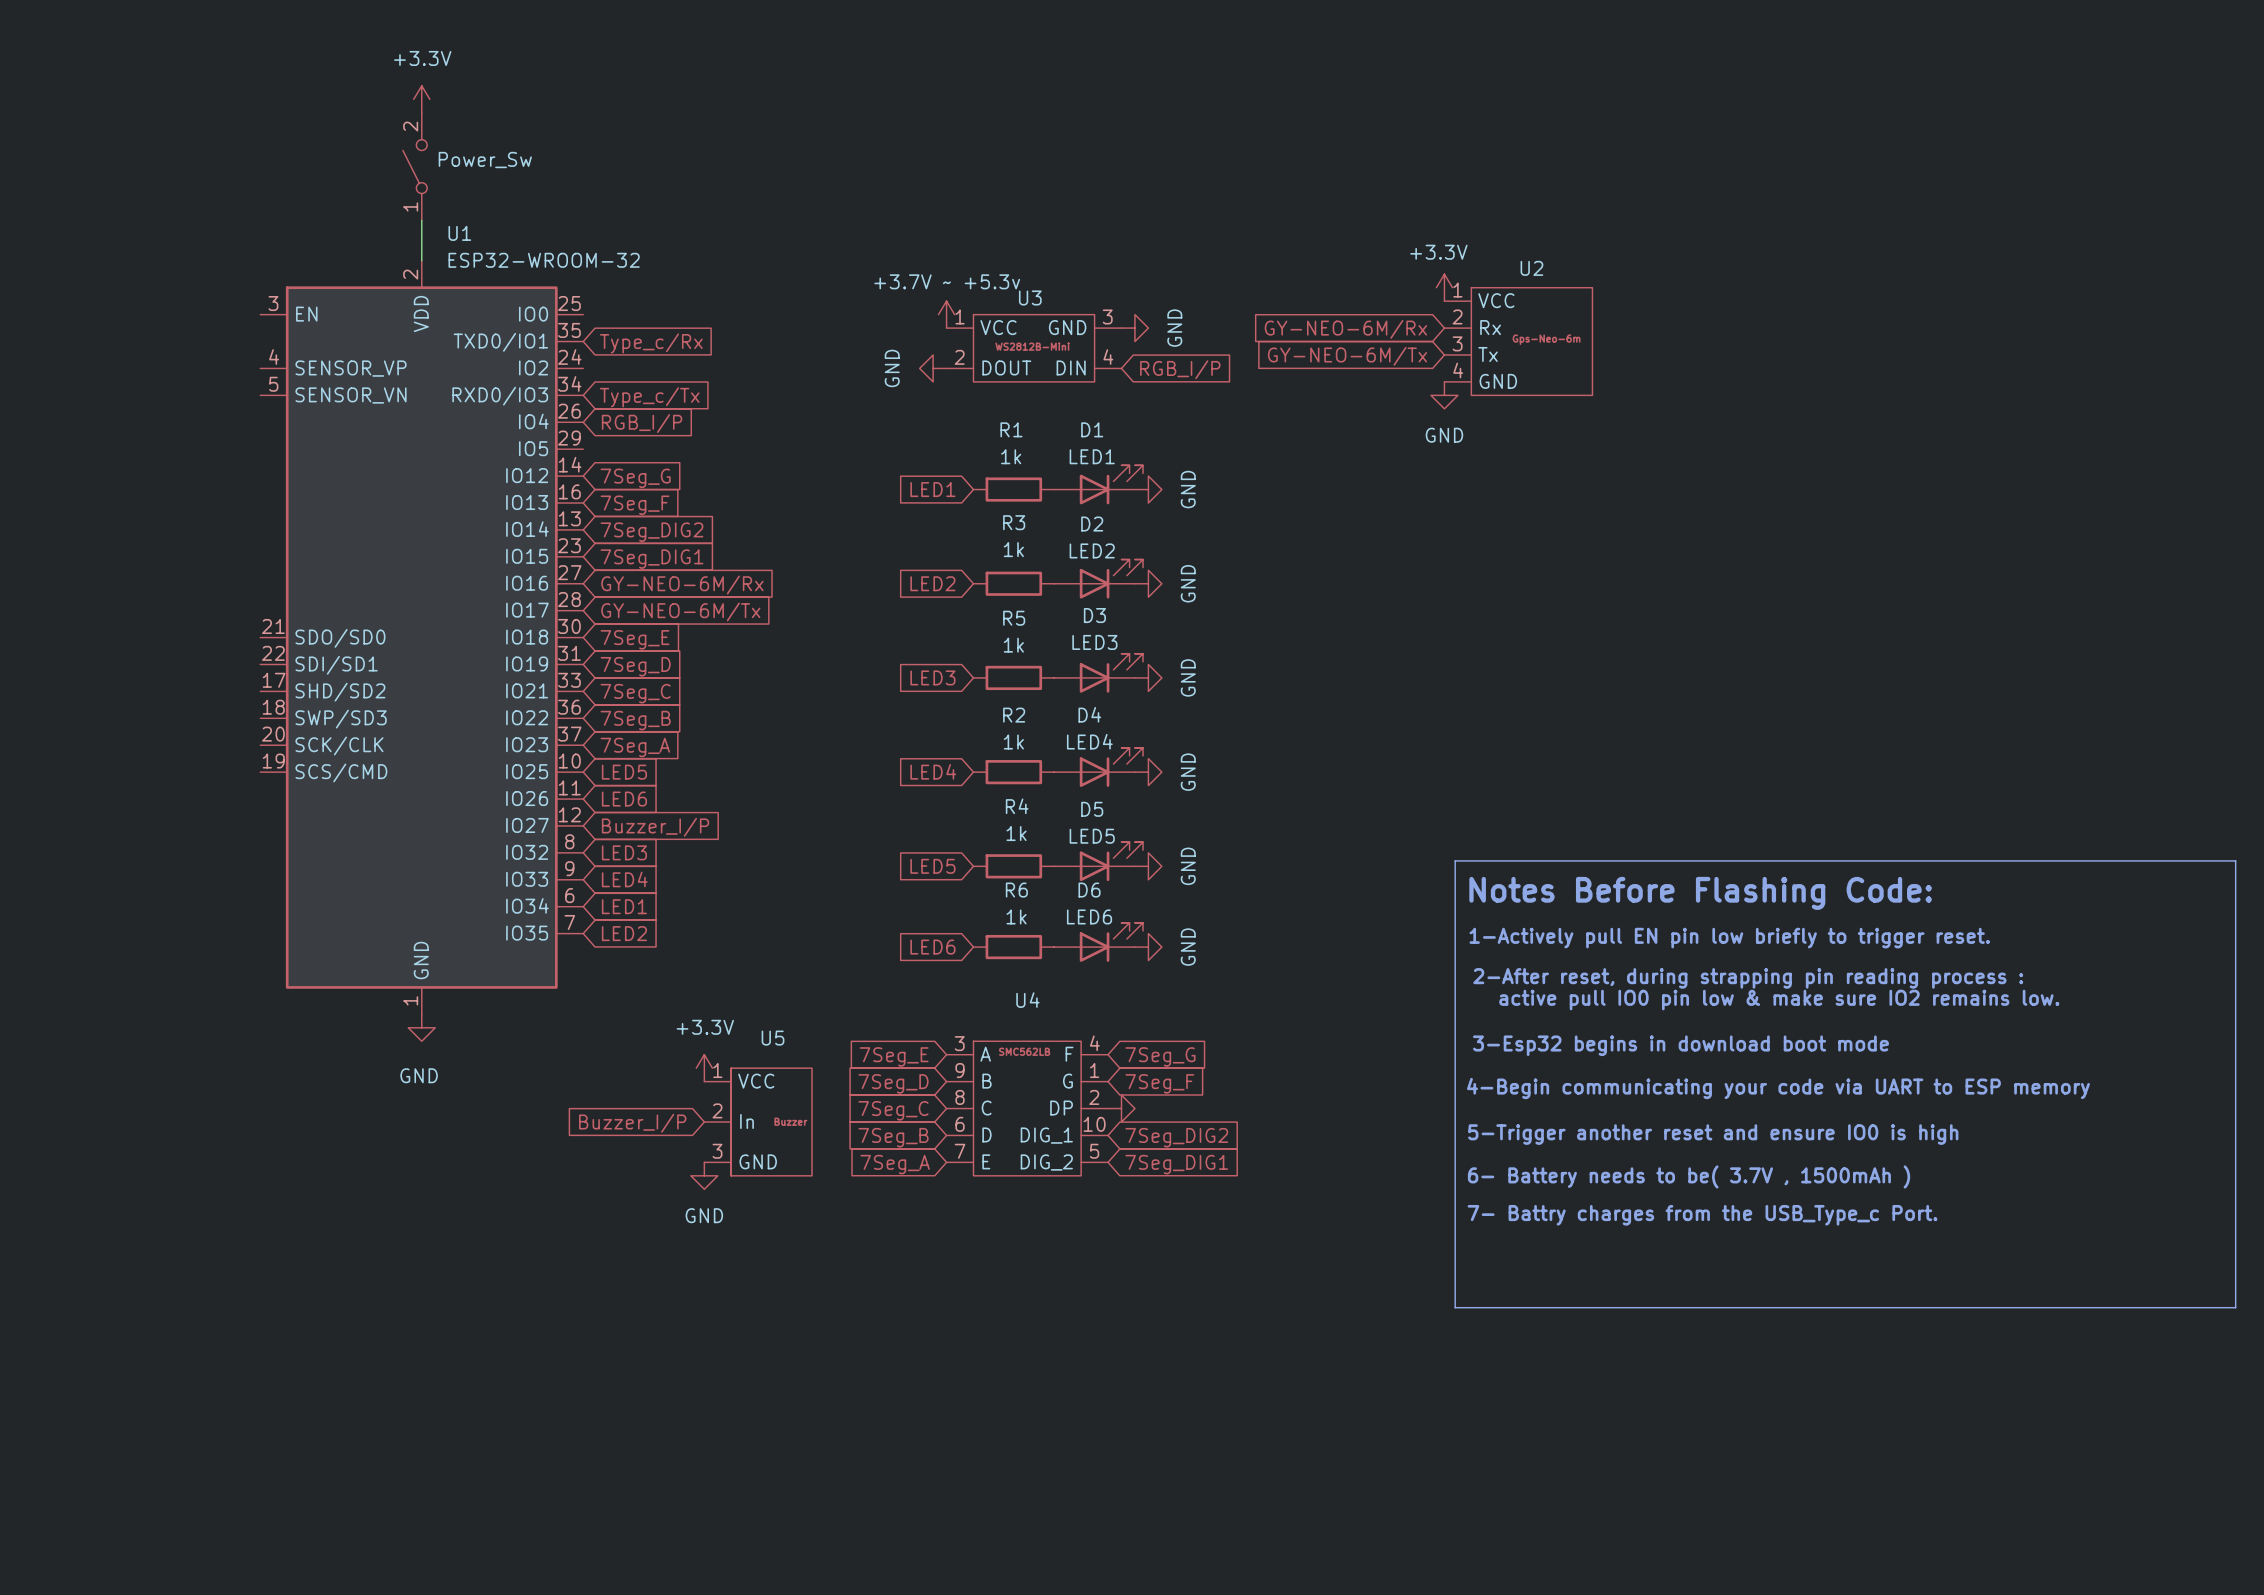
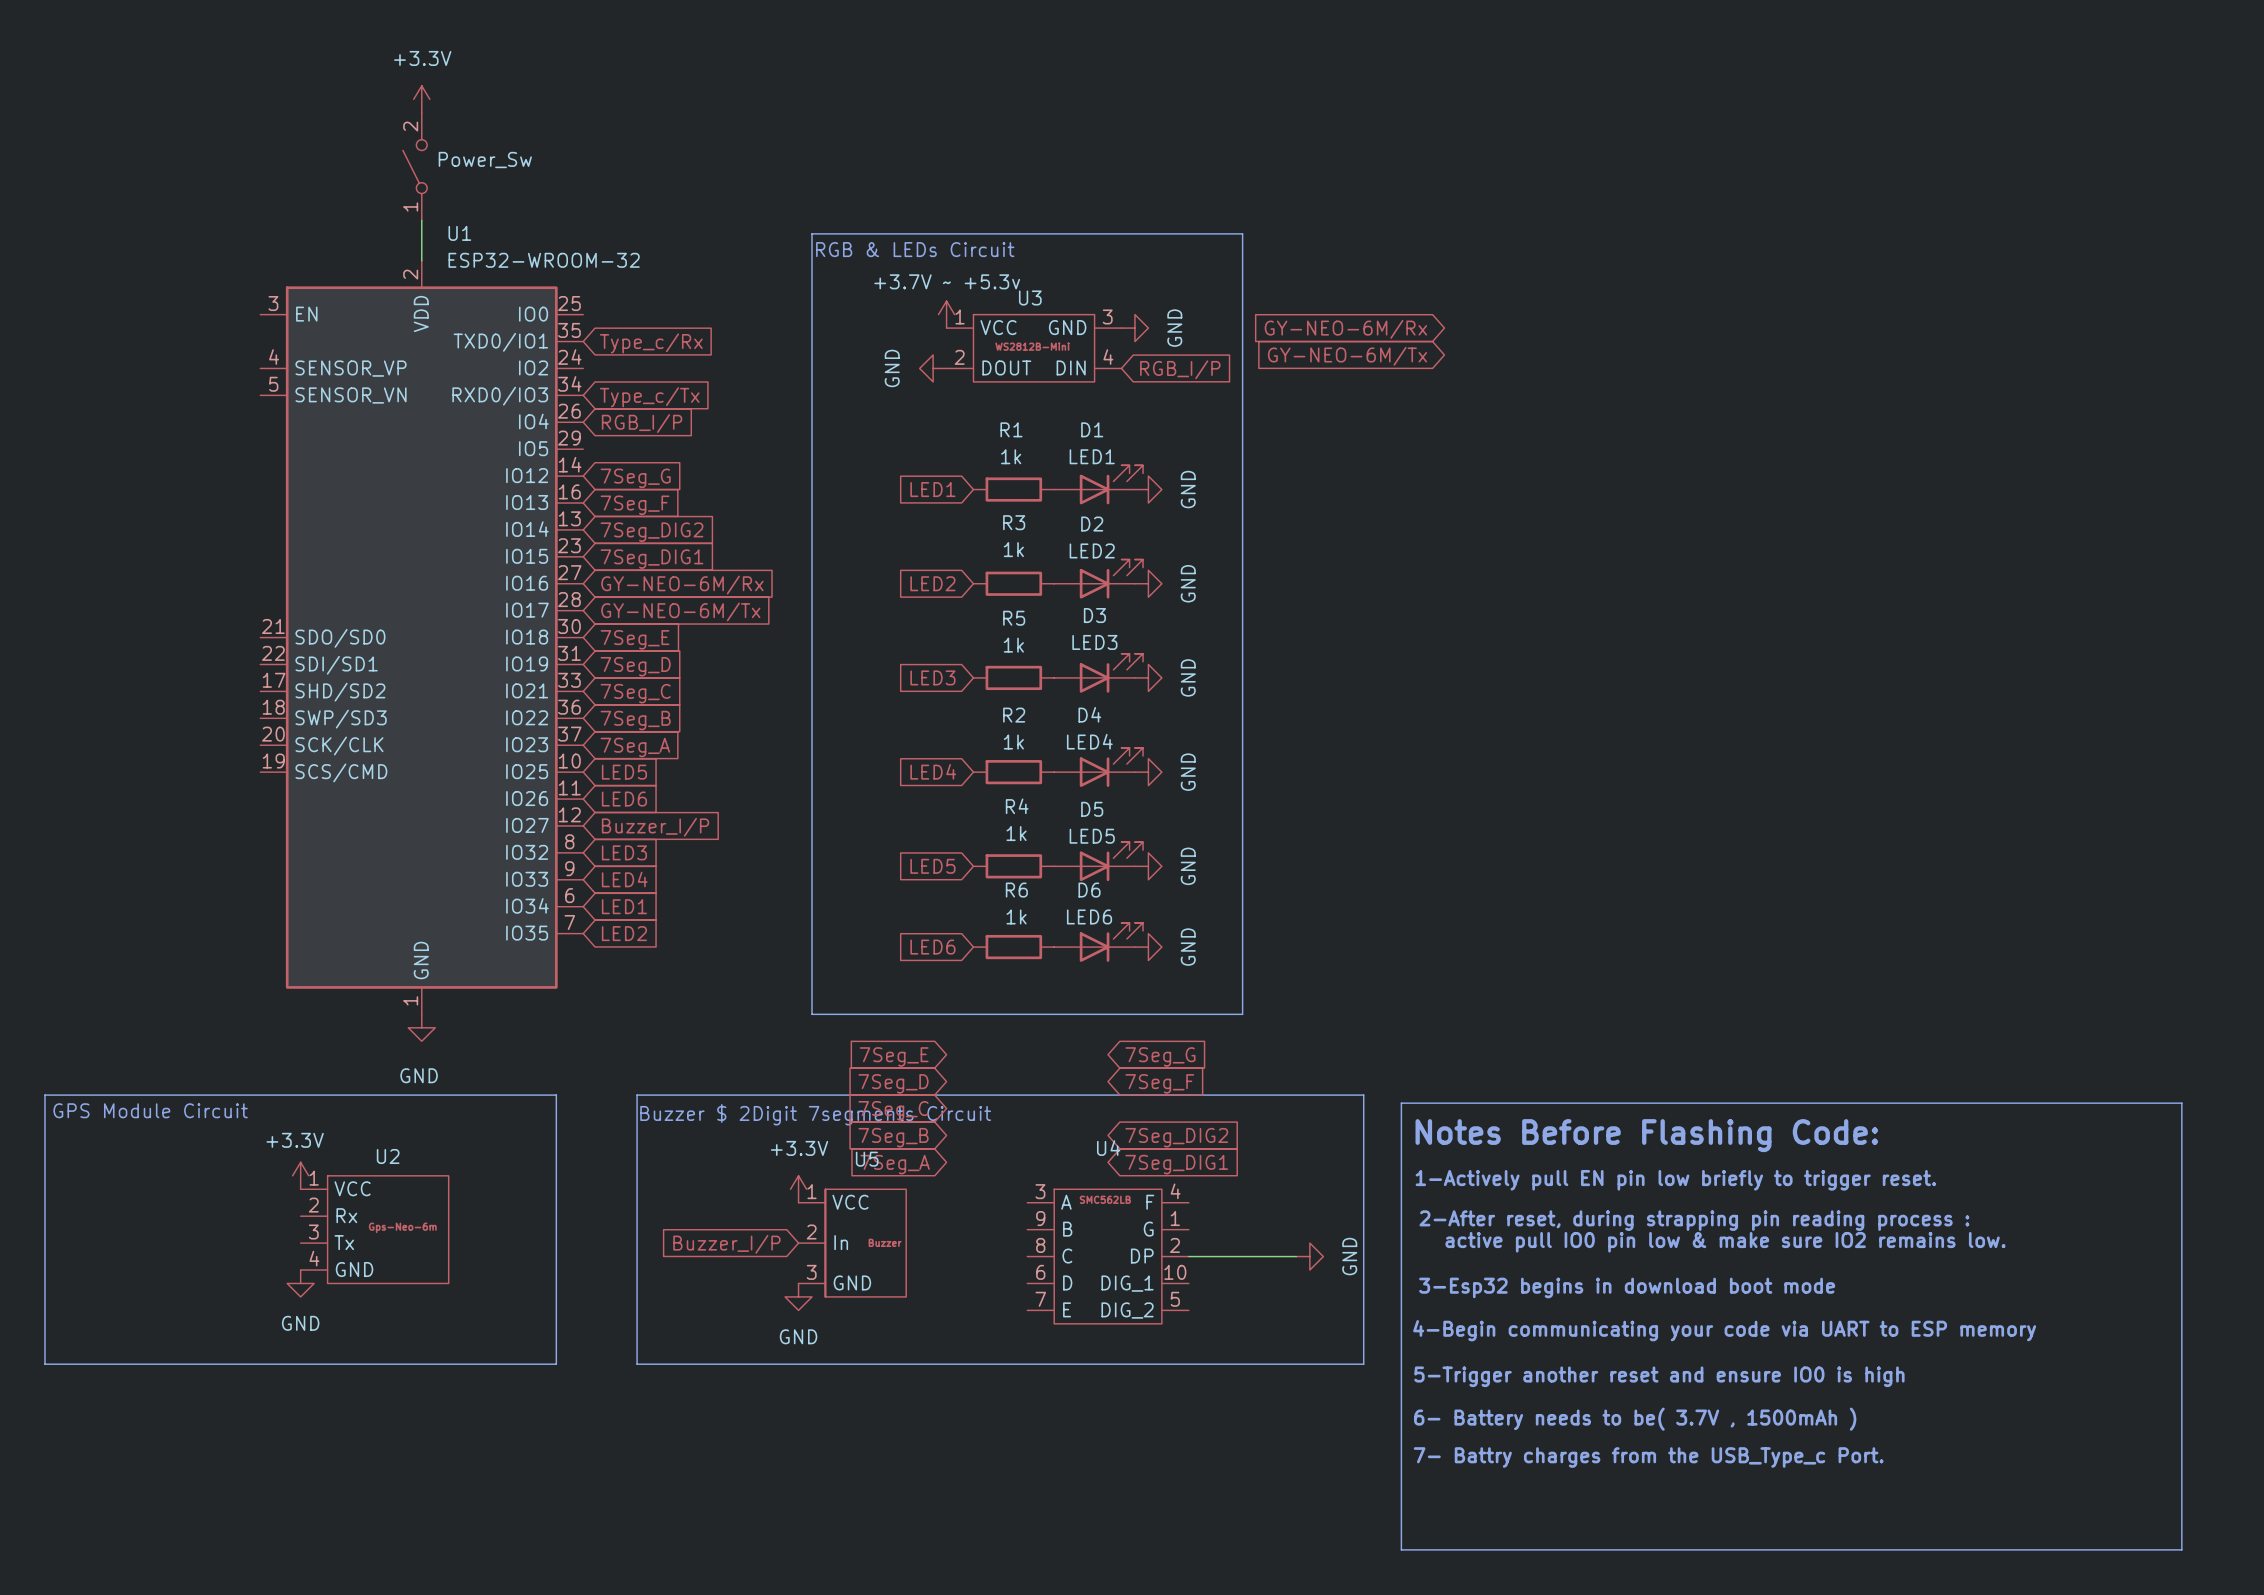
line: none -> (812, 233) (1242, 233) (1242, 1014) (812, 1014) (812, 233)
text: none -> RGB & LEDs Circuit (915, 249)
power symbol: +3.3V (1444, 287) -> none
U2 position: (1518, 341) -> (374, 1229)
power symbol: GND (1444, 395) -> none
line: (1455, 860) (2235, 860) (2235, 1307) (1455, 1307) (1455, 860) -> (1401, 1103) (2181, 1103) (2181, 1549) (1401, 1549) (1401, 1103)
text position: Notes Before Flashing Code: (1700, 893) -> Notes Before Flashing Code: (1646, 1135)
text position: 1-Actively pull EN pin low briefly to trigger reset. (1729, 938) -> 1-Actively pull EN pin low briefly to trigger reset. (1675, 1180)
text position: 2-After reset, during strapping pin reading process : (1748, 978) -> 2-After reset, during strapping pin reading process : (1694, 1220)
text position: active pull IO0 pin low & make sure IO2 remains low. (1779, 1000) -> active pull IO0 pin low & make sure IO2 remains low. (1725, 1242)
text position: 3-Esp32 begins in download boot mode (1680, 1045) -> 3-Esp32 begins in download boot mode (1627, 1287)
power symbol position: +3.3V (704, 1068) -> +3.3V (798, 1189)
text position: 4-Begin communicating your code via UART to ESP memory (1778, 1088) -> 4-Begin communicating your code via UART to ESP memory (1724, 1330)
line: none -> (45, 1095) (556, 1095) (556, 1364) (45, 1364) (45, 1095)
line: none -> (637, 1095) (1363, 1095) (1363, 1364) (637, 1364) (637, 1095)
U4 position: (1027, 1108) -> (1108, 1256)
power symbol: (1121, 1108) -> none
text: none -> GPS Module Circuit (150, 1110)
text: none -> Buzzer $ 2Digit 7segments Circuit (815, 1114)
U5 position: (758, 1122) -> (852, 1243)
global label position: Buzzer_I/P (632, 1123) -> Buzzer_I/P (726, 1244)
text position: 5-Trigger another reset and ensure IO0 is high (1713, 1134) -> 5-Trigger another reset and ensure IO0 is high (1659, 1376)
power symbol: none -> +3.3V (300, 1175)
power symbol position: GND (704, 1175) -> GND (798, 1296)
text position: 6- Battery needs to be( 3.7V , 1500mAh ) (1689, 1176) -> 6- Battery needs to be( 3.7V , 1500mAh ) (1635, 1419)
text position: 7- Battry charges from the USB_Type_c Port. (1702, 1215) -> 7- Battry charges from the USB_Type_c Port. (1648, 1457)
wire: none -> (1188, 1256) (1296, 1256)
power symbol: none -> GND (1309, 1256)
power symbol: none -> GND (300, 1283)

